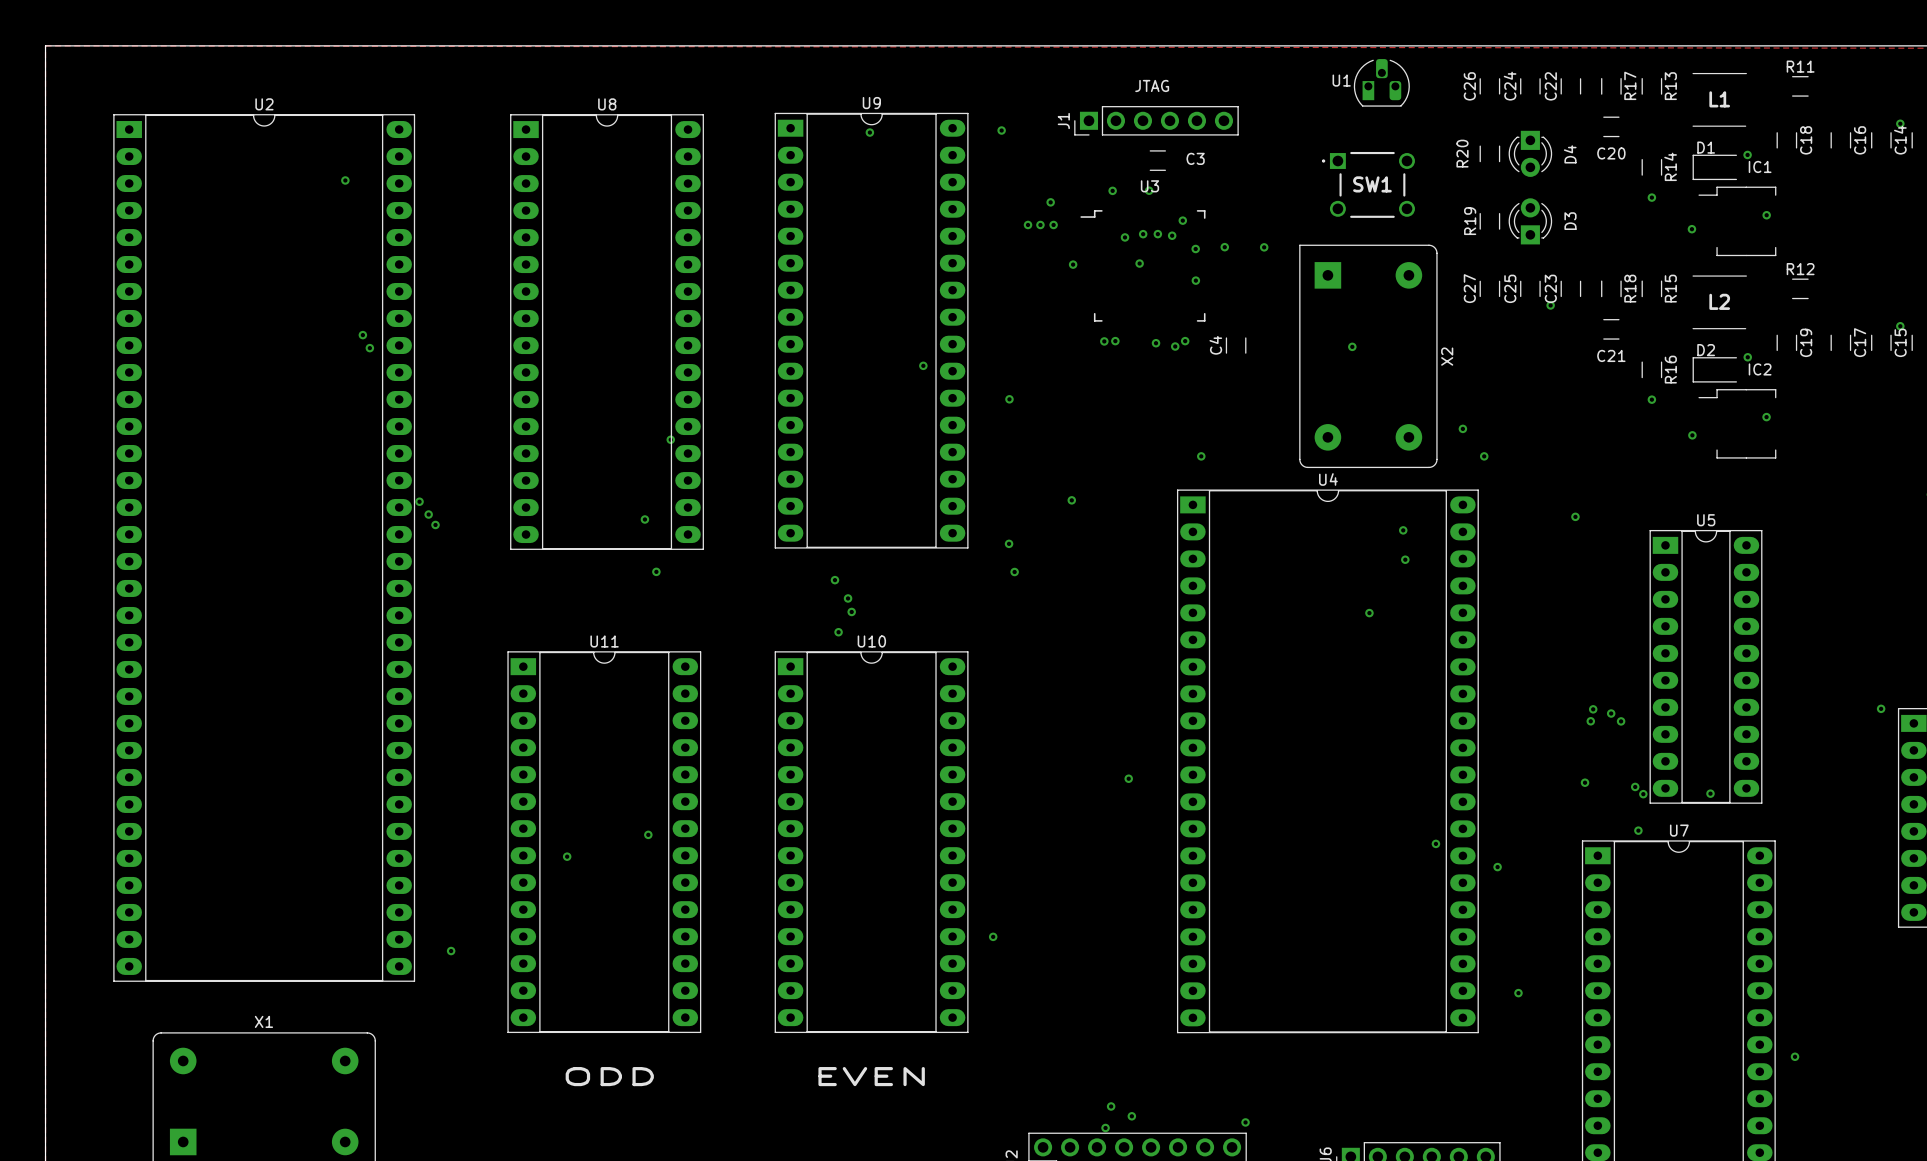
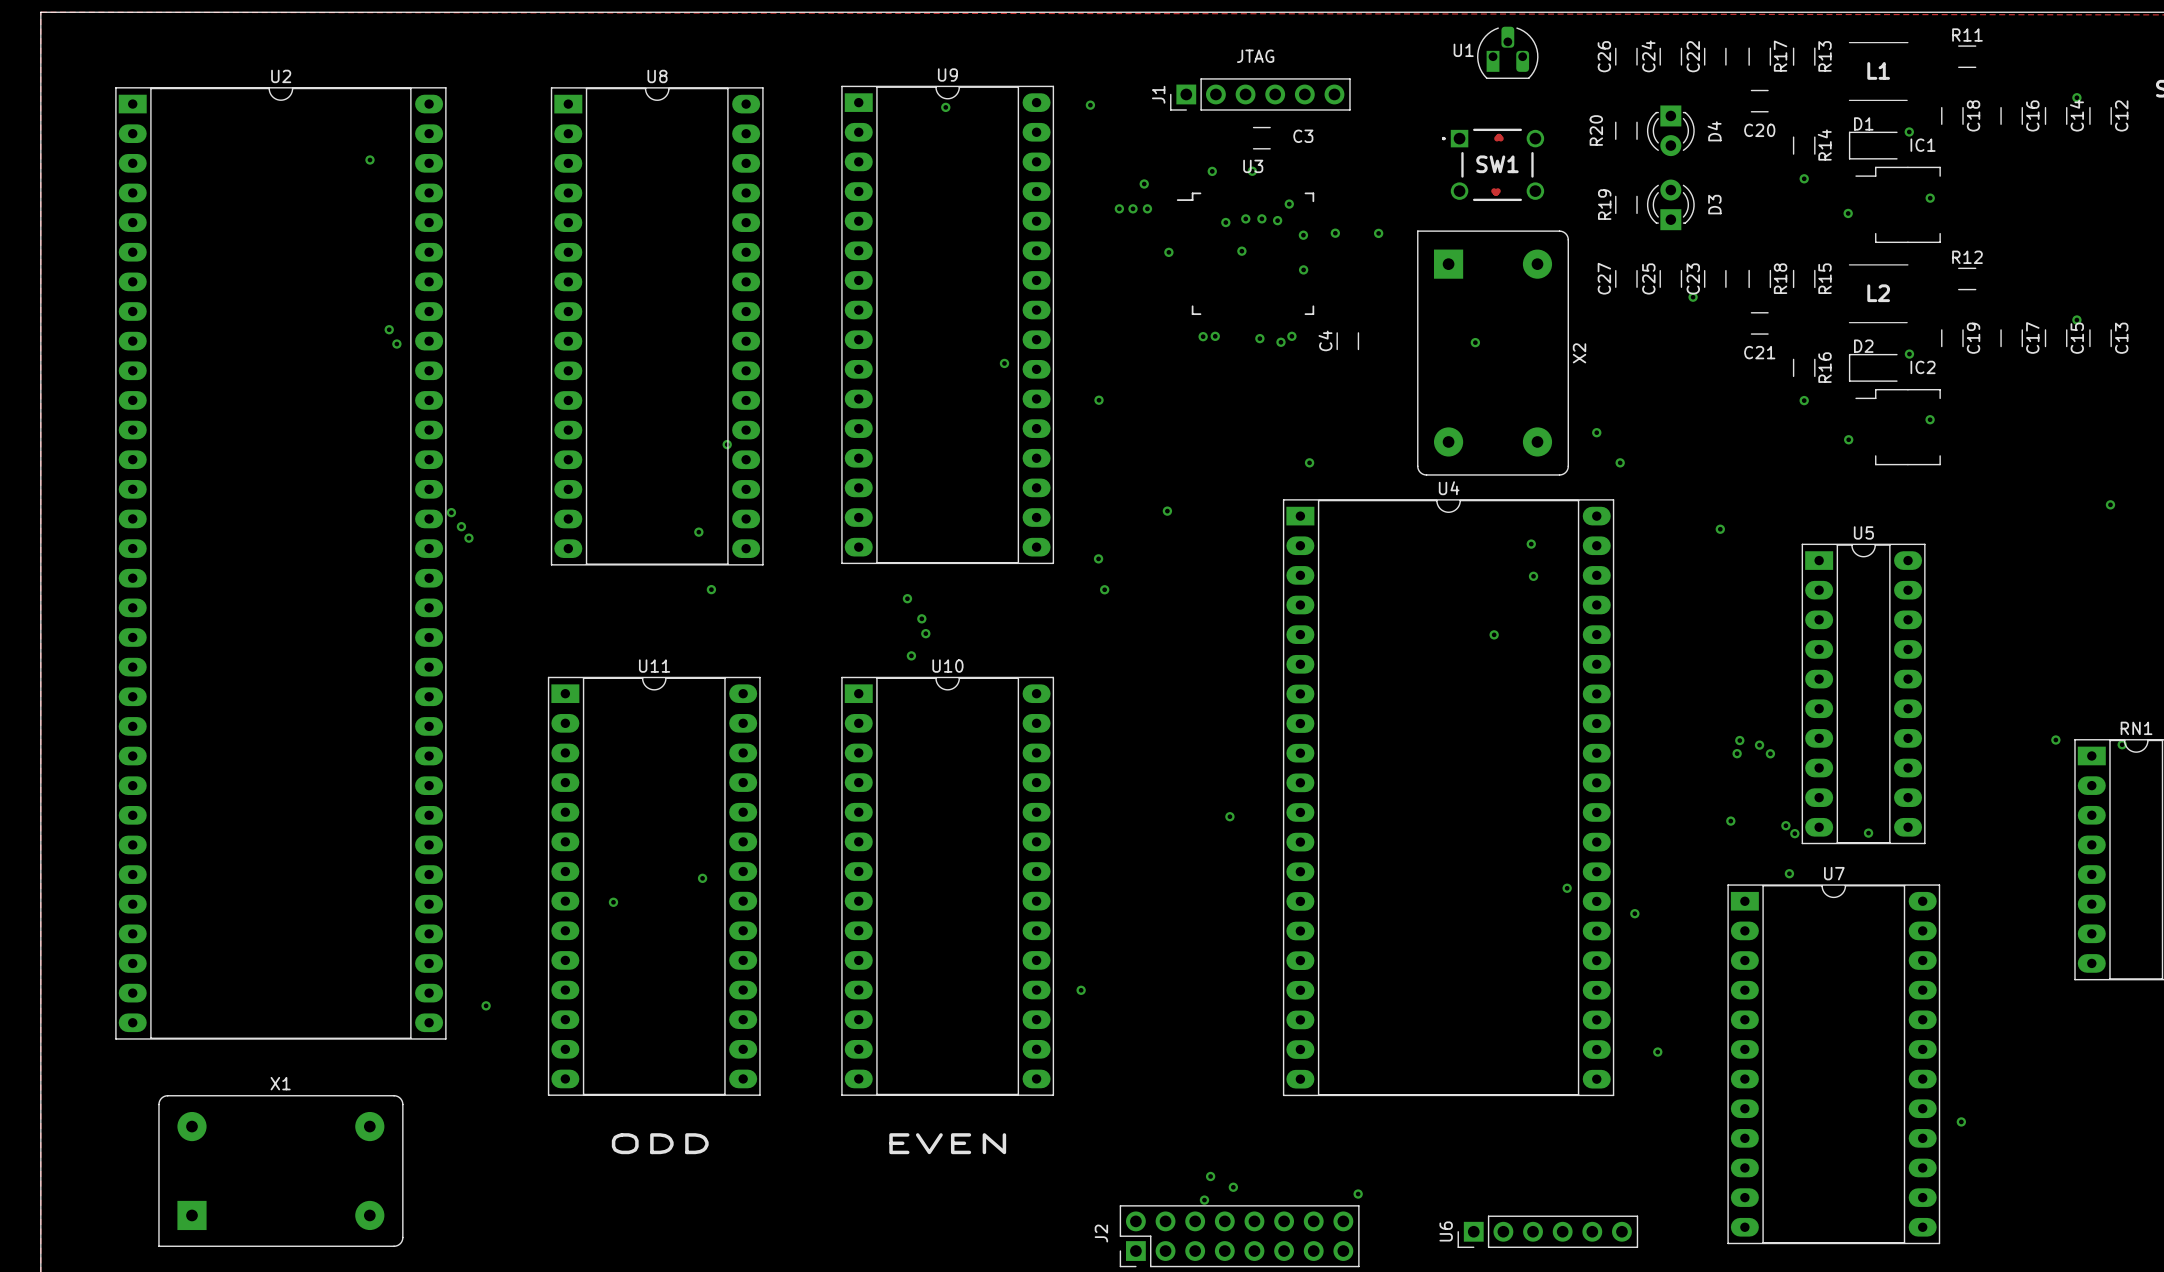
track: none -> (1497, 138) (1498, 136) (1500, 138)
track: none -> (1494, 191) (1495, 193) (1497, 191)

